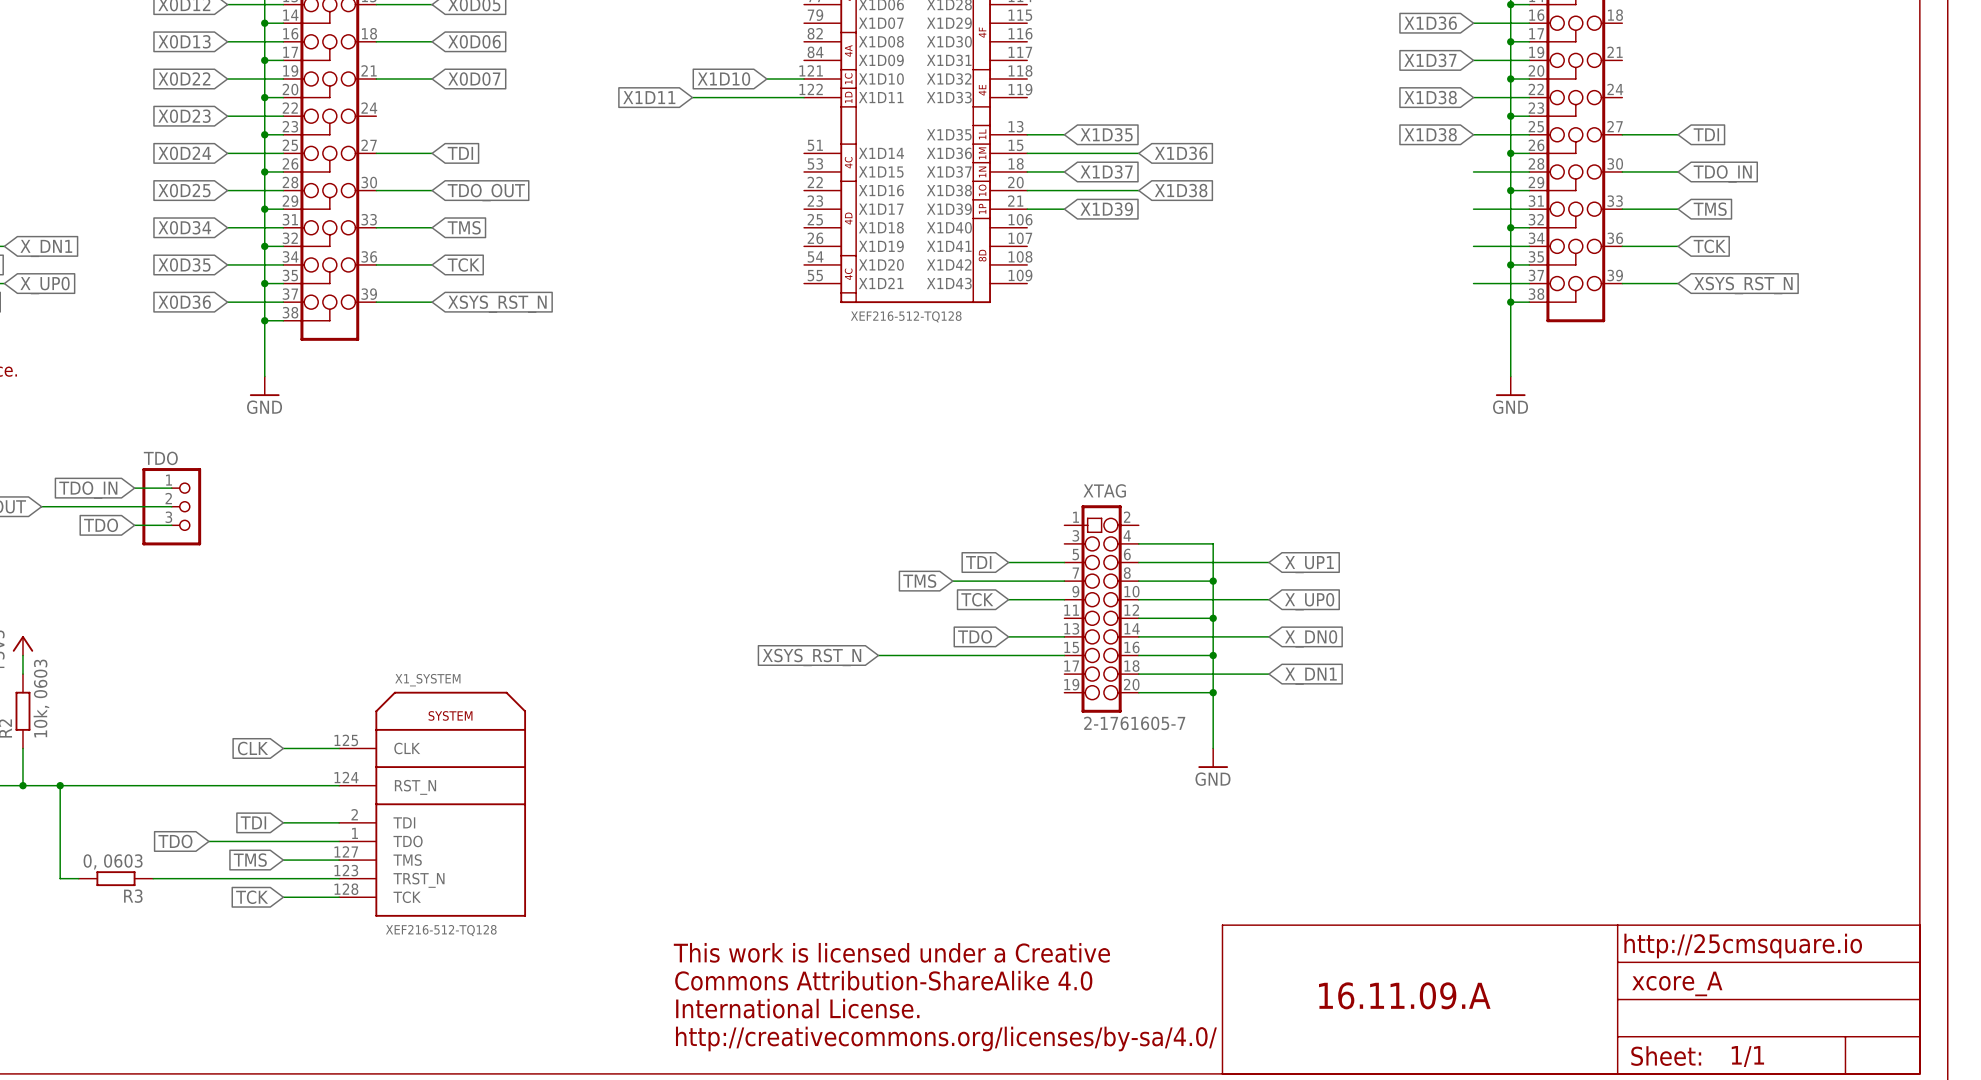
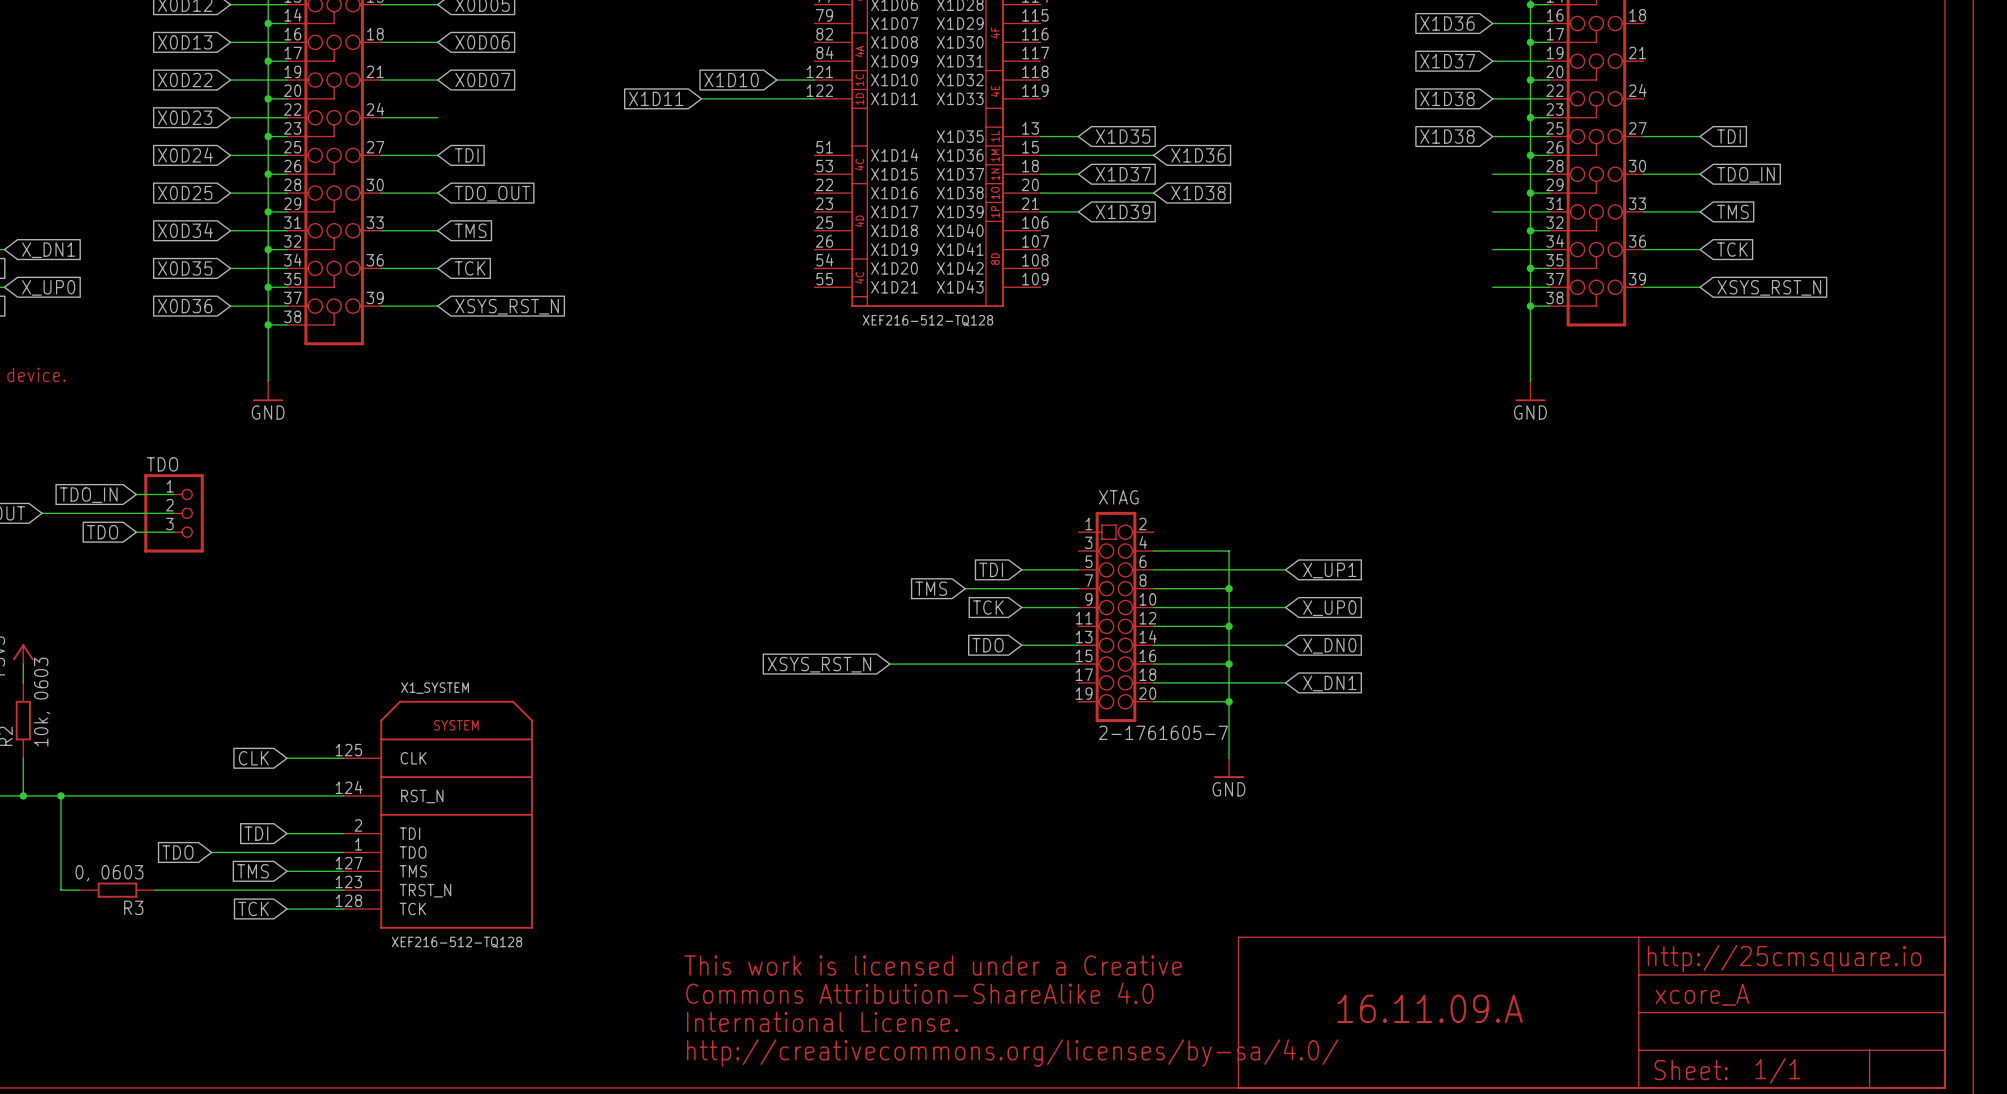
wire: none -> (381, 117) (437, 117)

